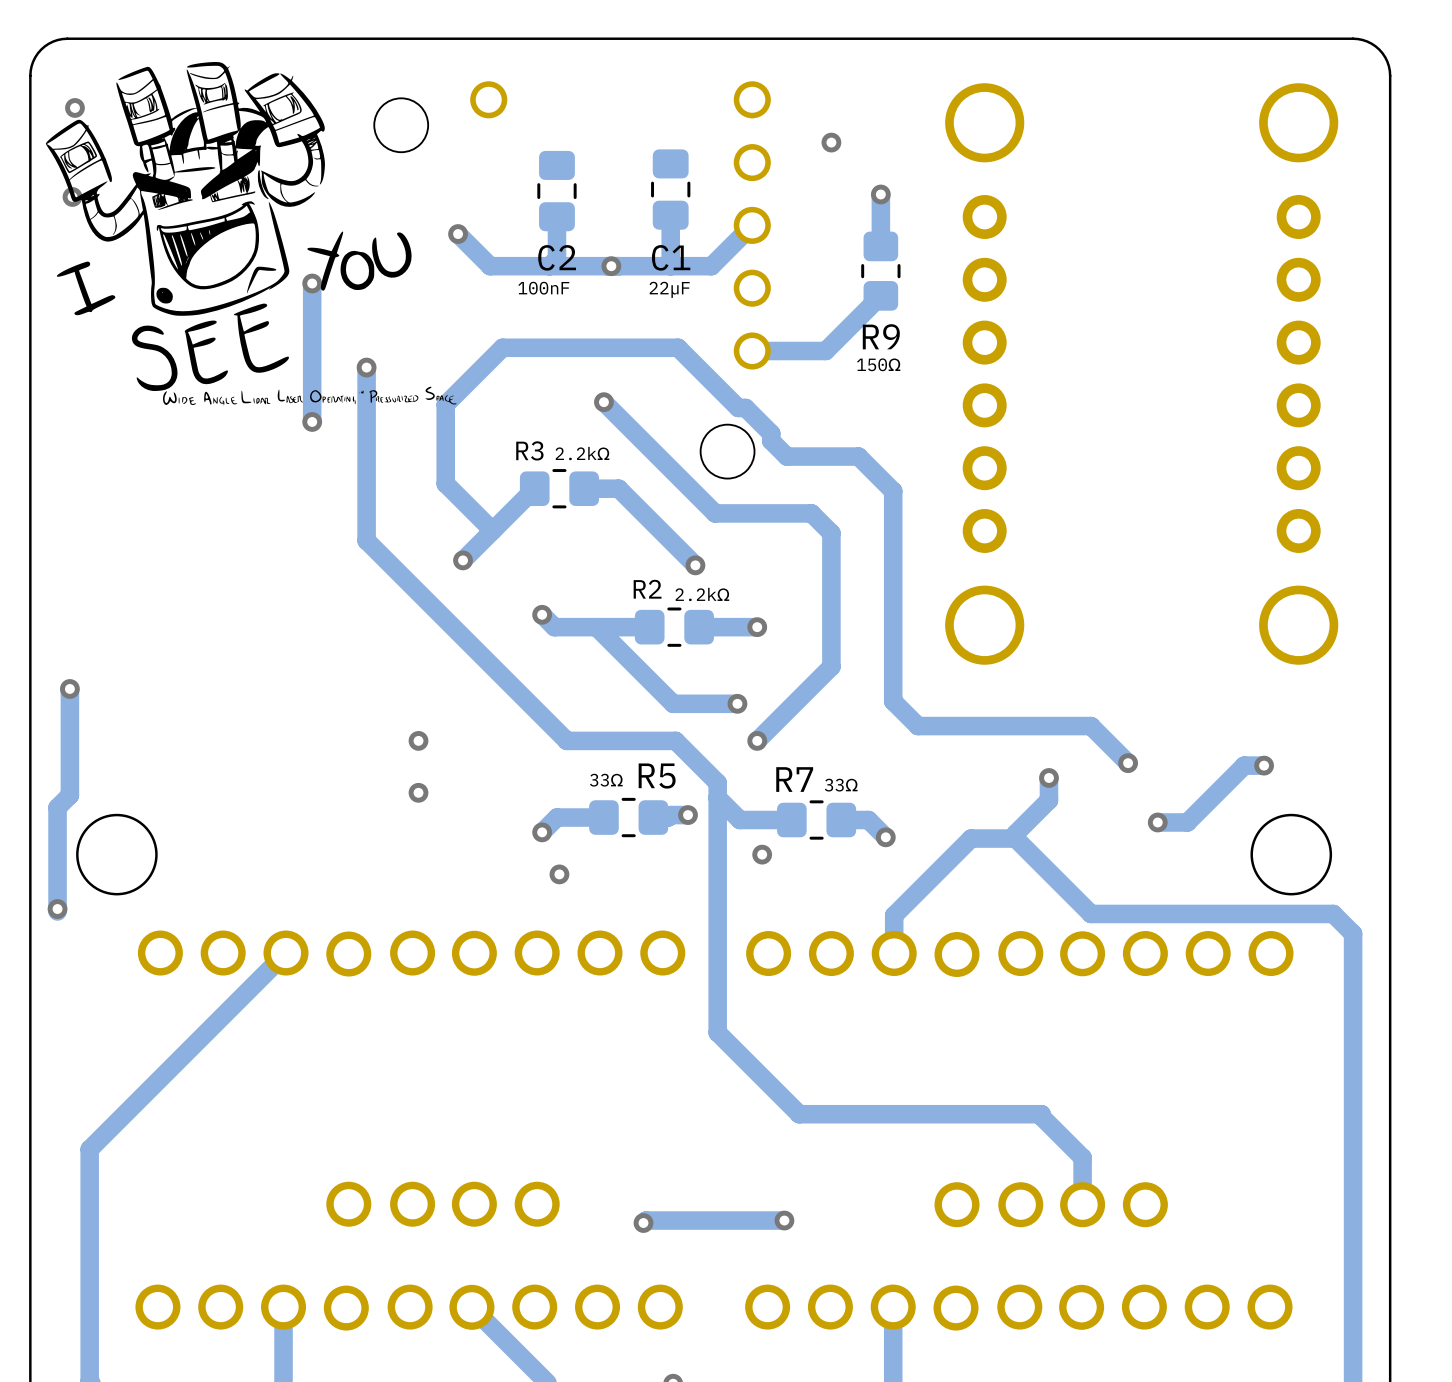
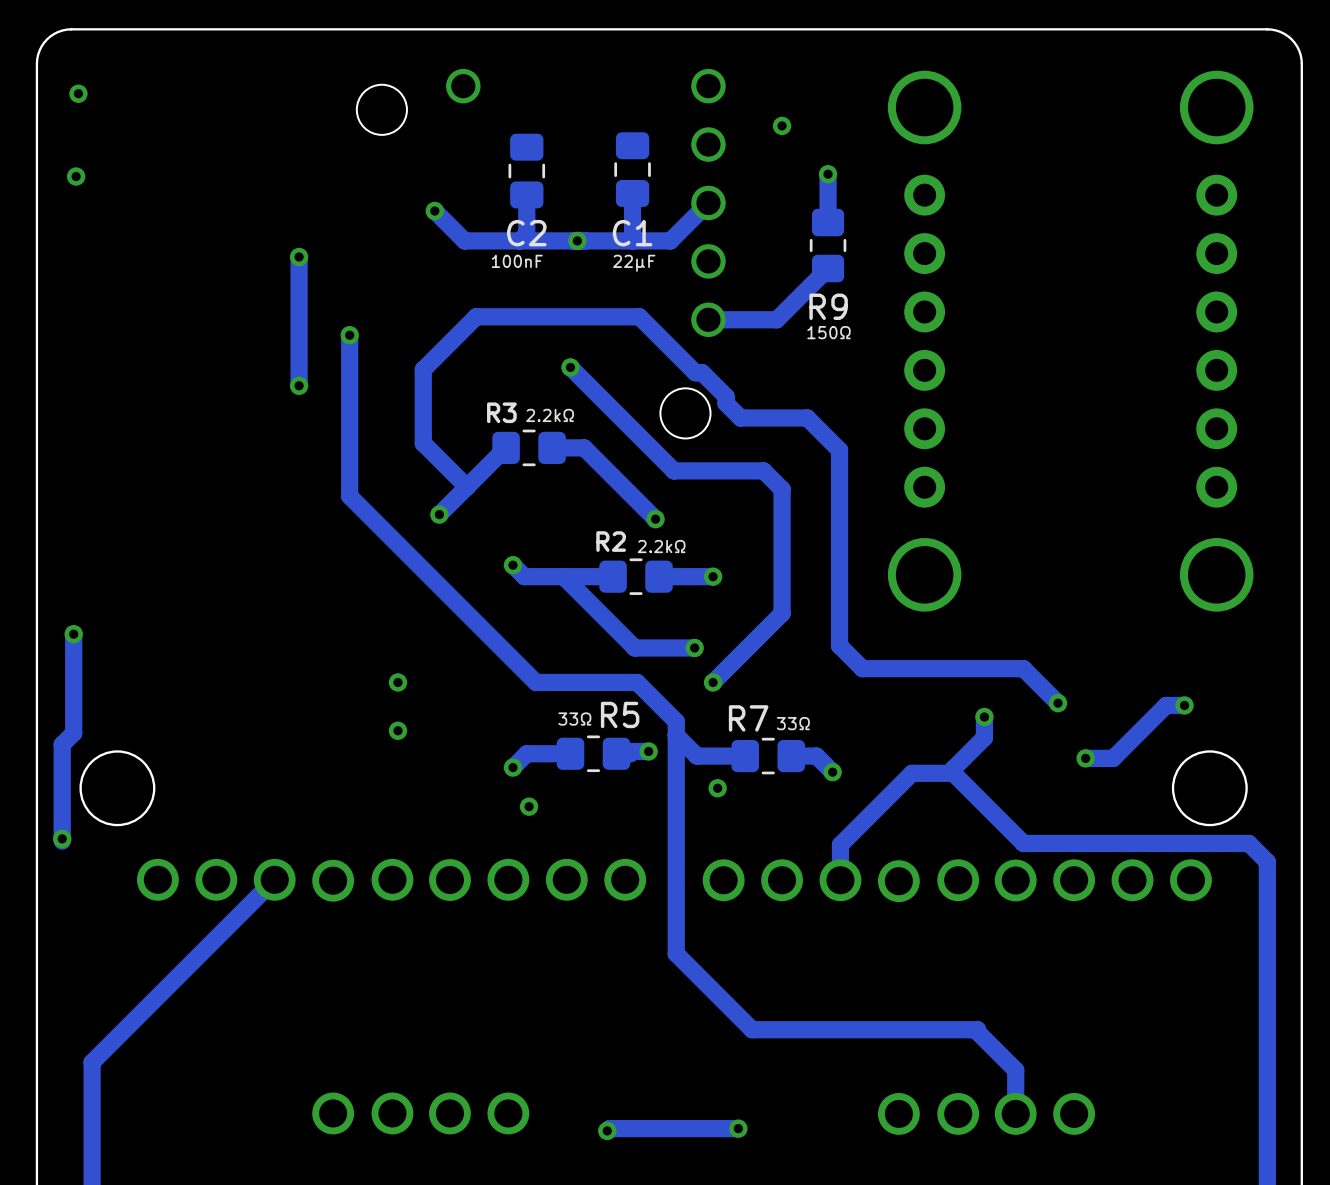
drawing: [45, 61, 457, 406] -> none

